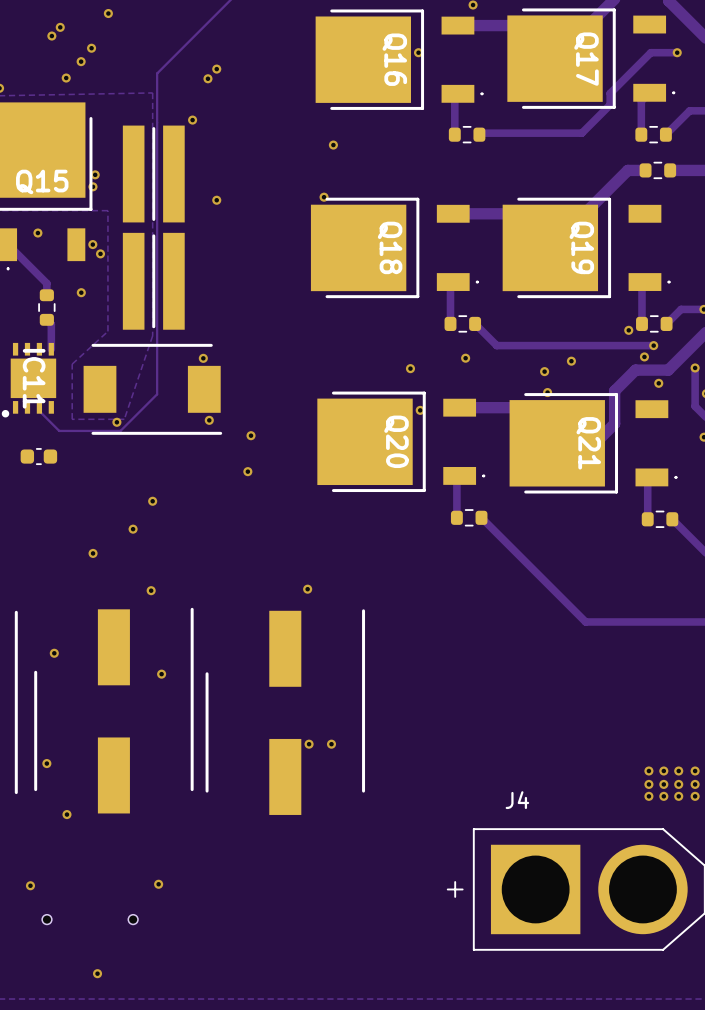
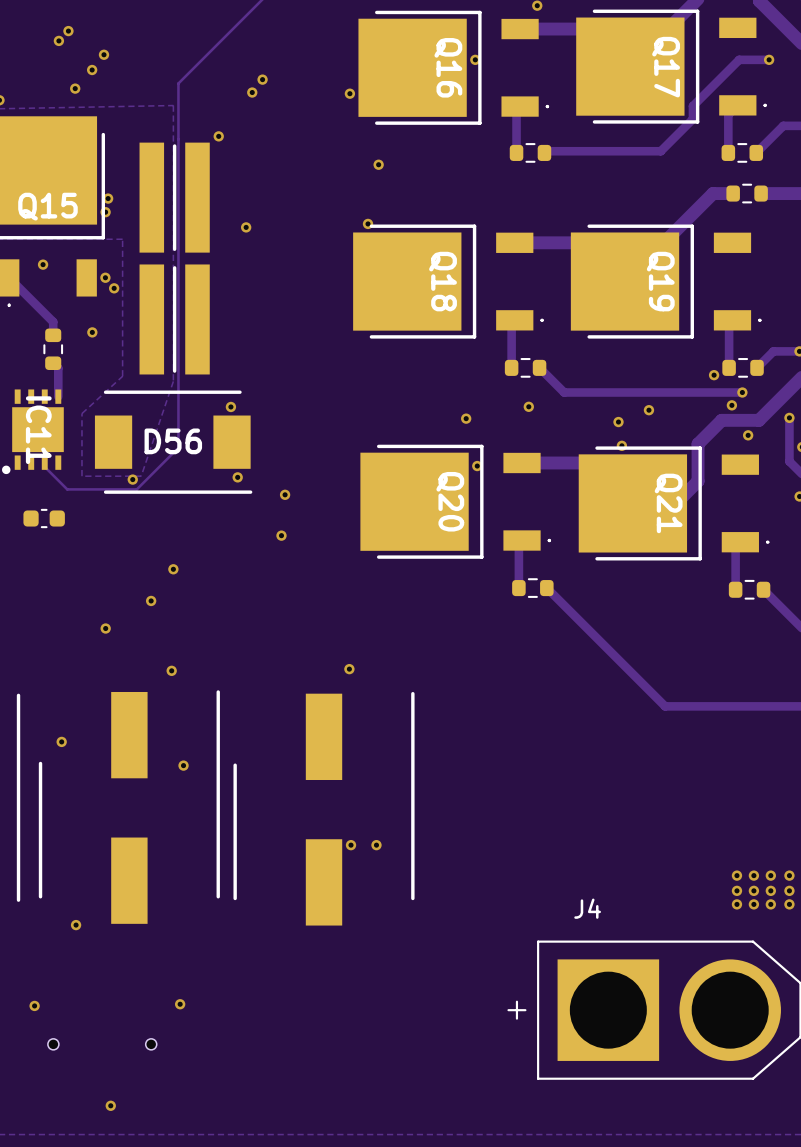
via: (108, 13) -> none
via: (216, 69) -> none
via: none -> (262, 79)
via: (207, 78) -> none
via: none -> (252, 92)
via: none -> (349, 93)
D56 name: none -> D56 (173, 441)
via: (46, 763) -> none

